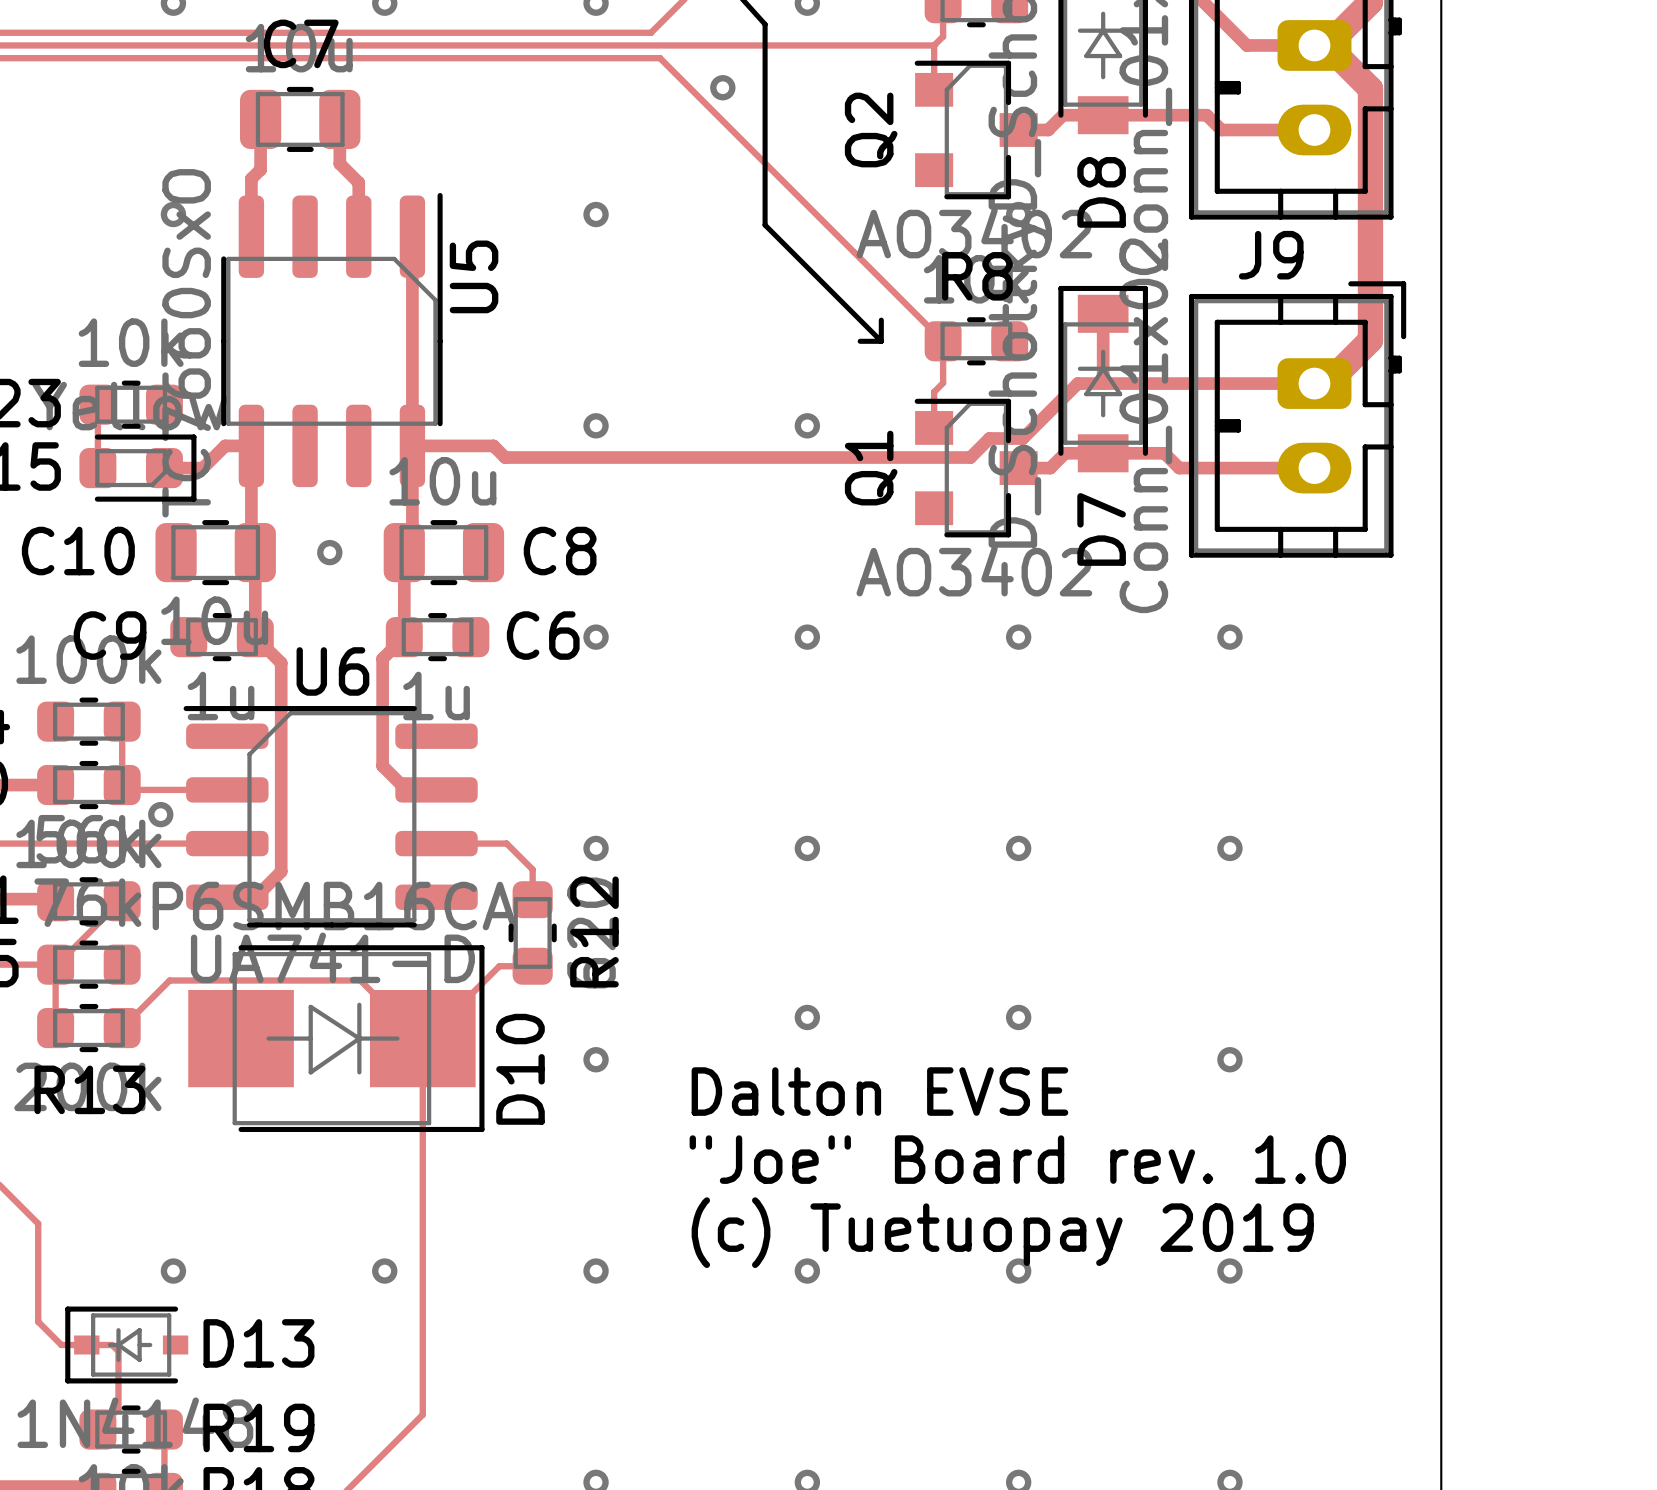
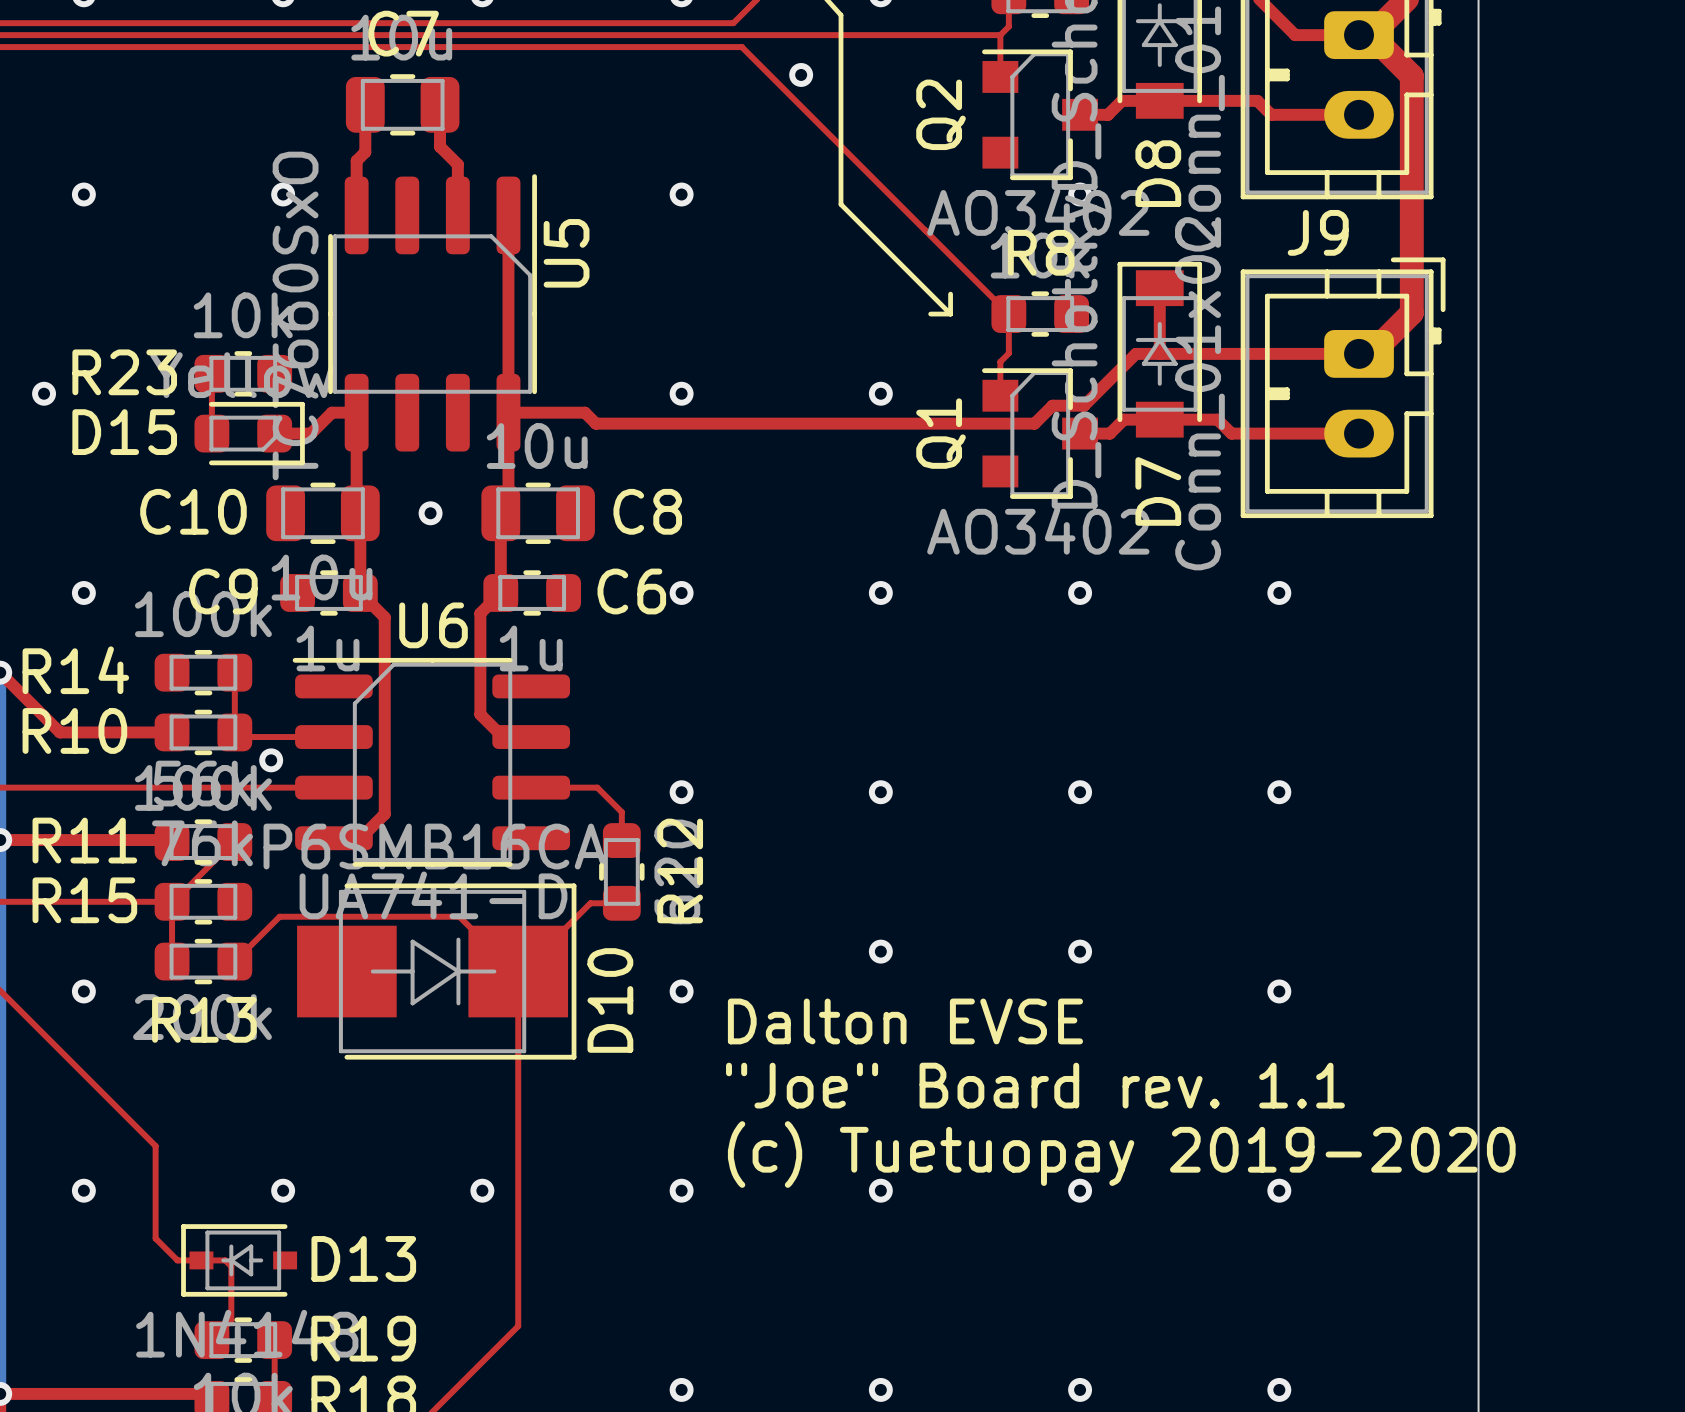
text position: Dalton EVSE (879, 1091) -> Dalton EVSE (905, 1021)
text: "Joe" Board rev. 1.0 (1017, 1159) -> "Joe" Board rev. 1.1 (1035, 1085)
text: (c) Tuetuopay 2019 (1002, 1232) -> (c) Tuetuopay 2019-2020 (1121, 1154)

